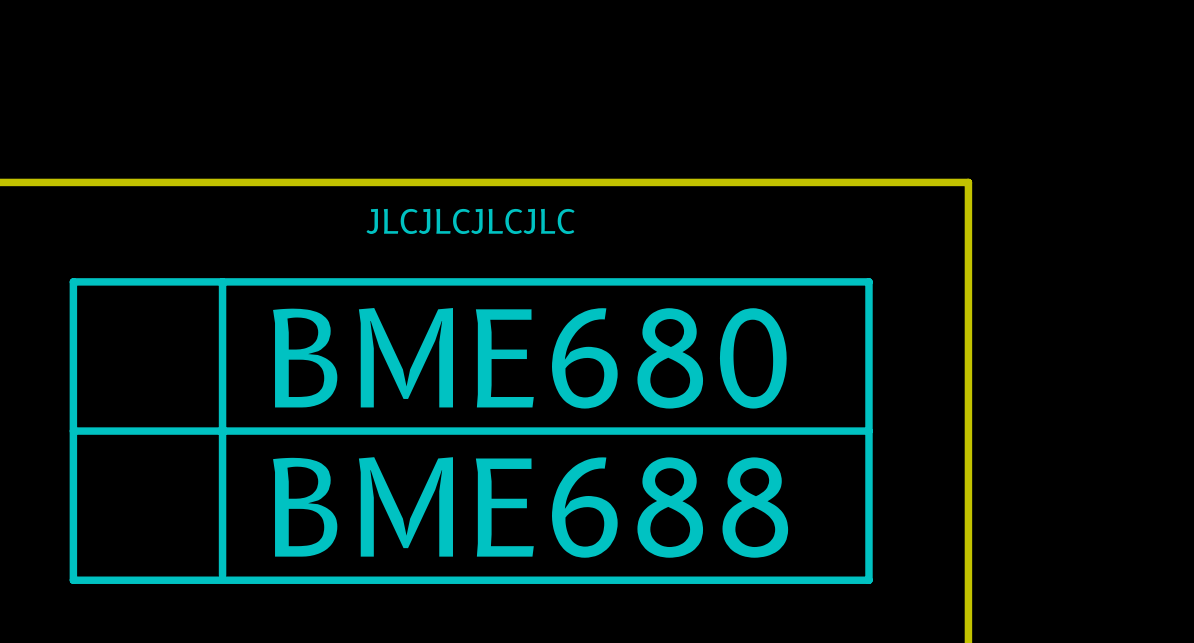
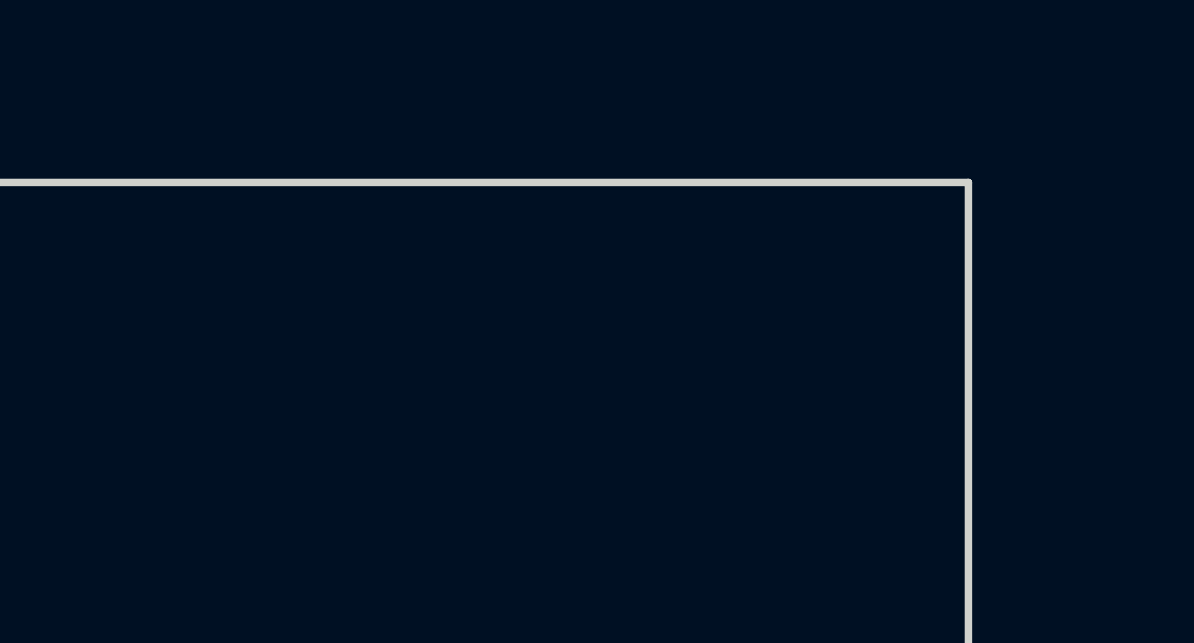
text: JLCJLCJLCJLC (470, 221) -> none
line: (222, 281) (222, 575) -> none
line: (868, 281) (868, 580) (73, 580) (73, 281) (868, 281) -> none
text: BME680 (529, 358) -> none
line: (868, 431) (73, 431) -> none
text: BME688 (530, 507) -> none

